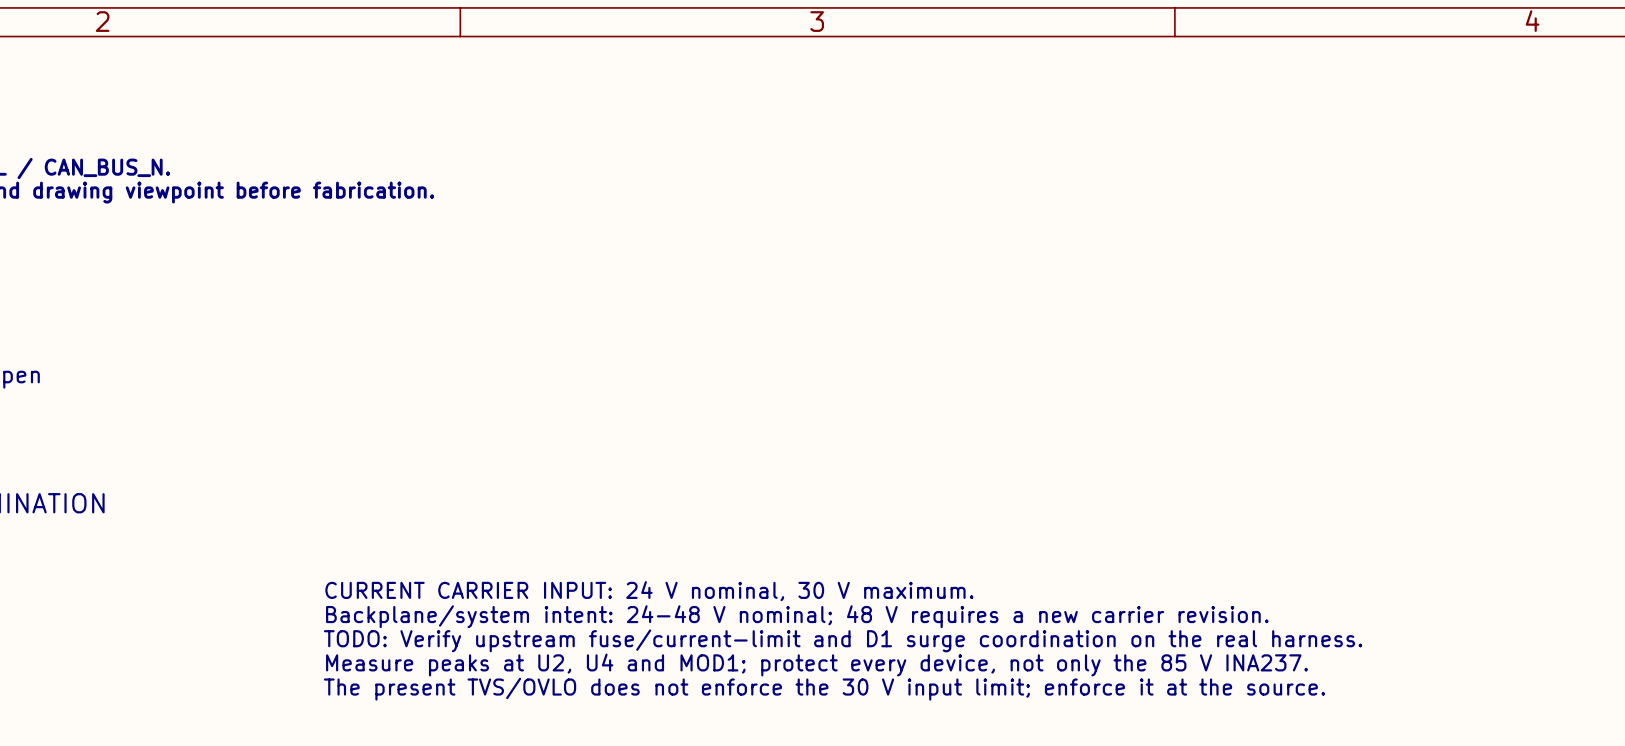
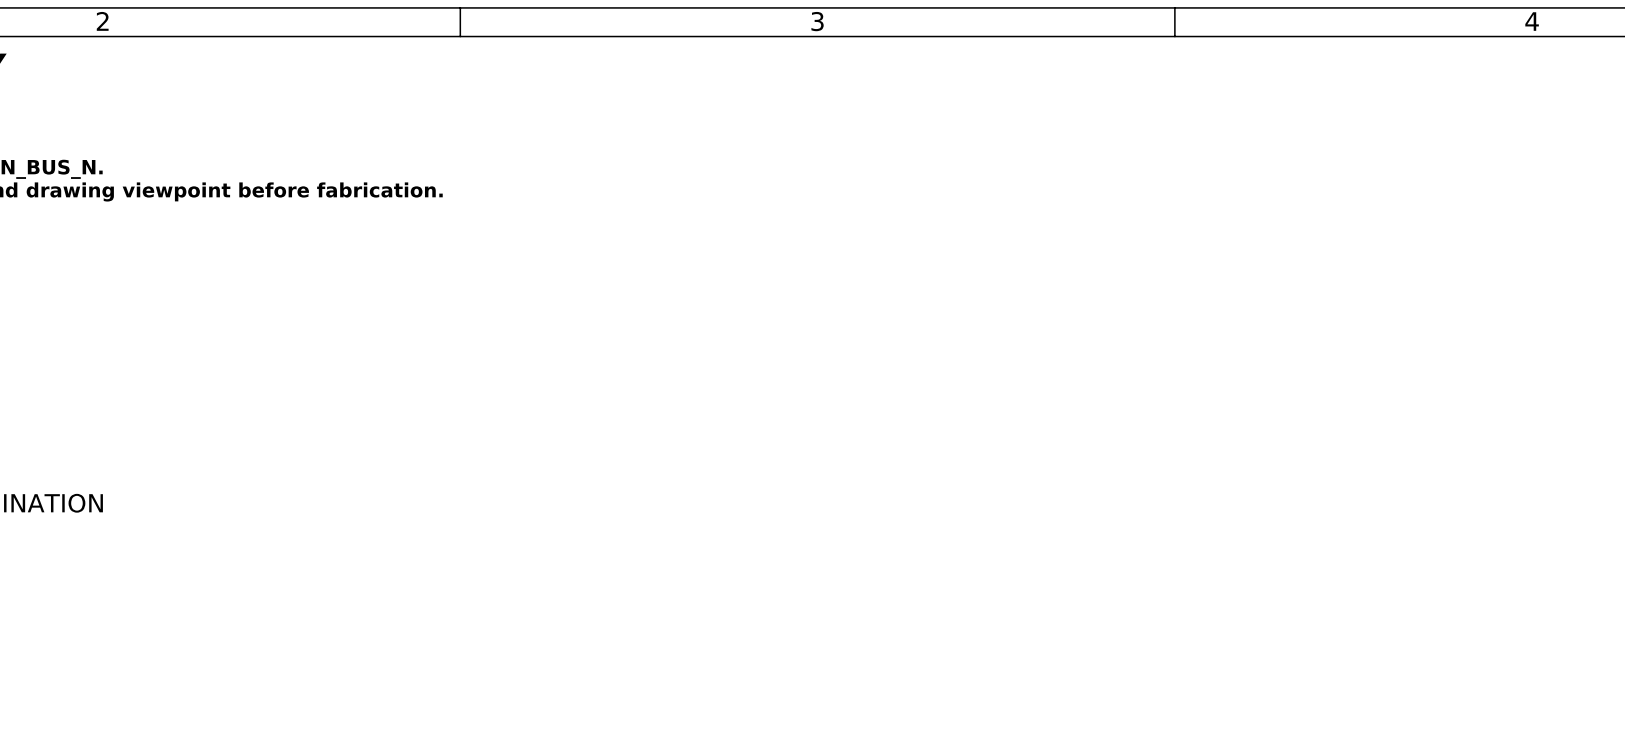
text: CURRENT CARRIER INPUT: 24 V nominal, 30 V maximum. (649, 591) -> none
text: Backplane/system intent: 24-48 V nominal; 48 V requires a new carrier revision. (797, 616) -> none
text: TODO: Verify upstream fuse/current-limit and D1 surge coordination on the real harness. (843, 640) -> none
text: Measure peaks at U2, U4 and MOD1; protect every device, not only the 85 V INA237. (816, 665) -> none
text: The present TVS/OVLO does not enforce the 30 V input limit; enforce it at the source. (824, 689) -> none

